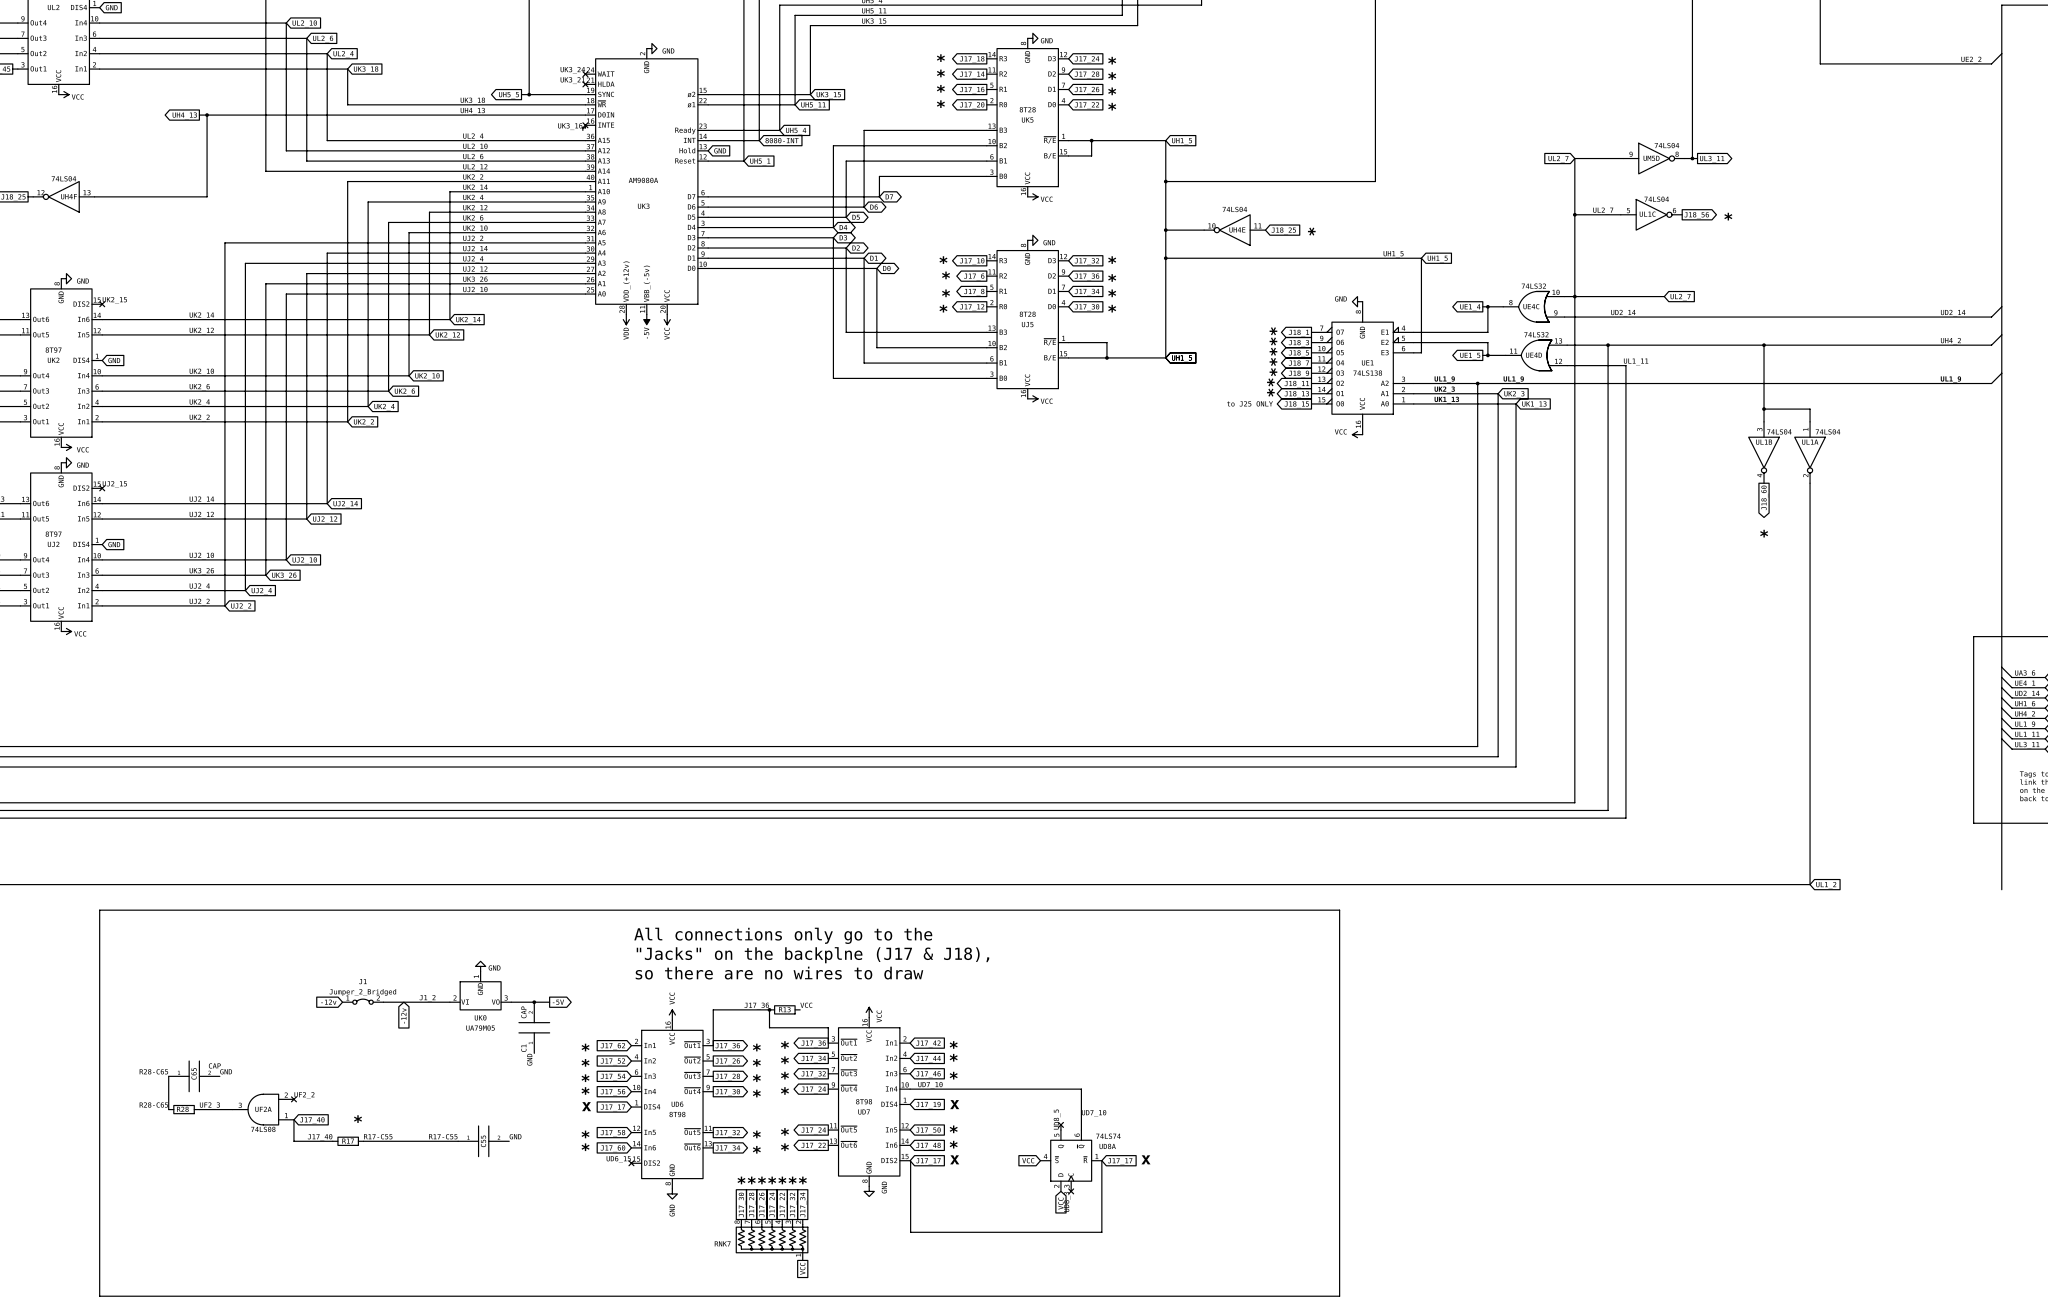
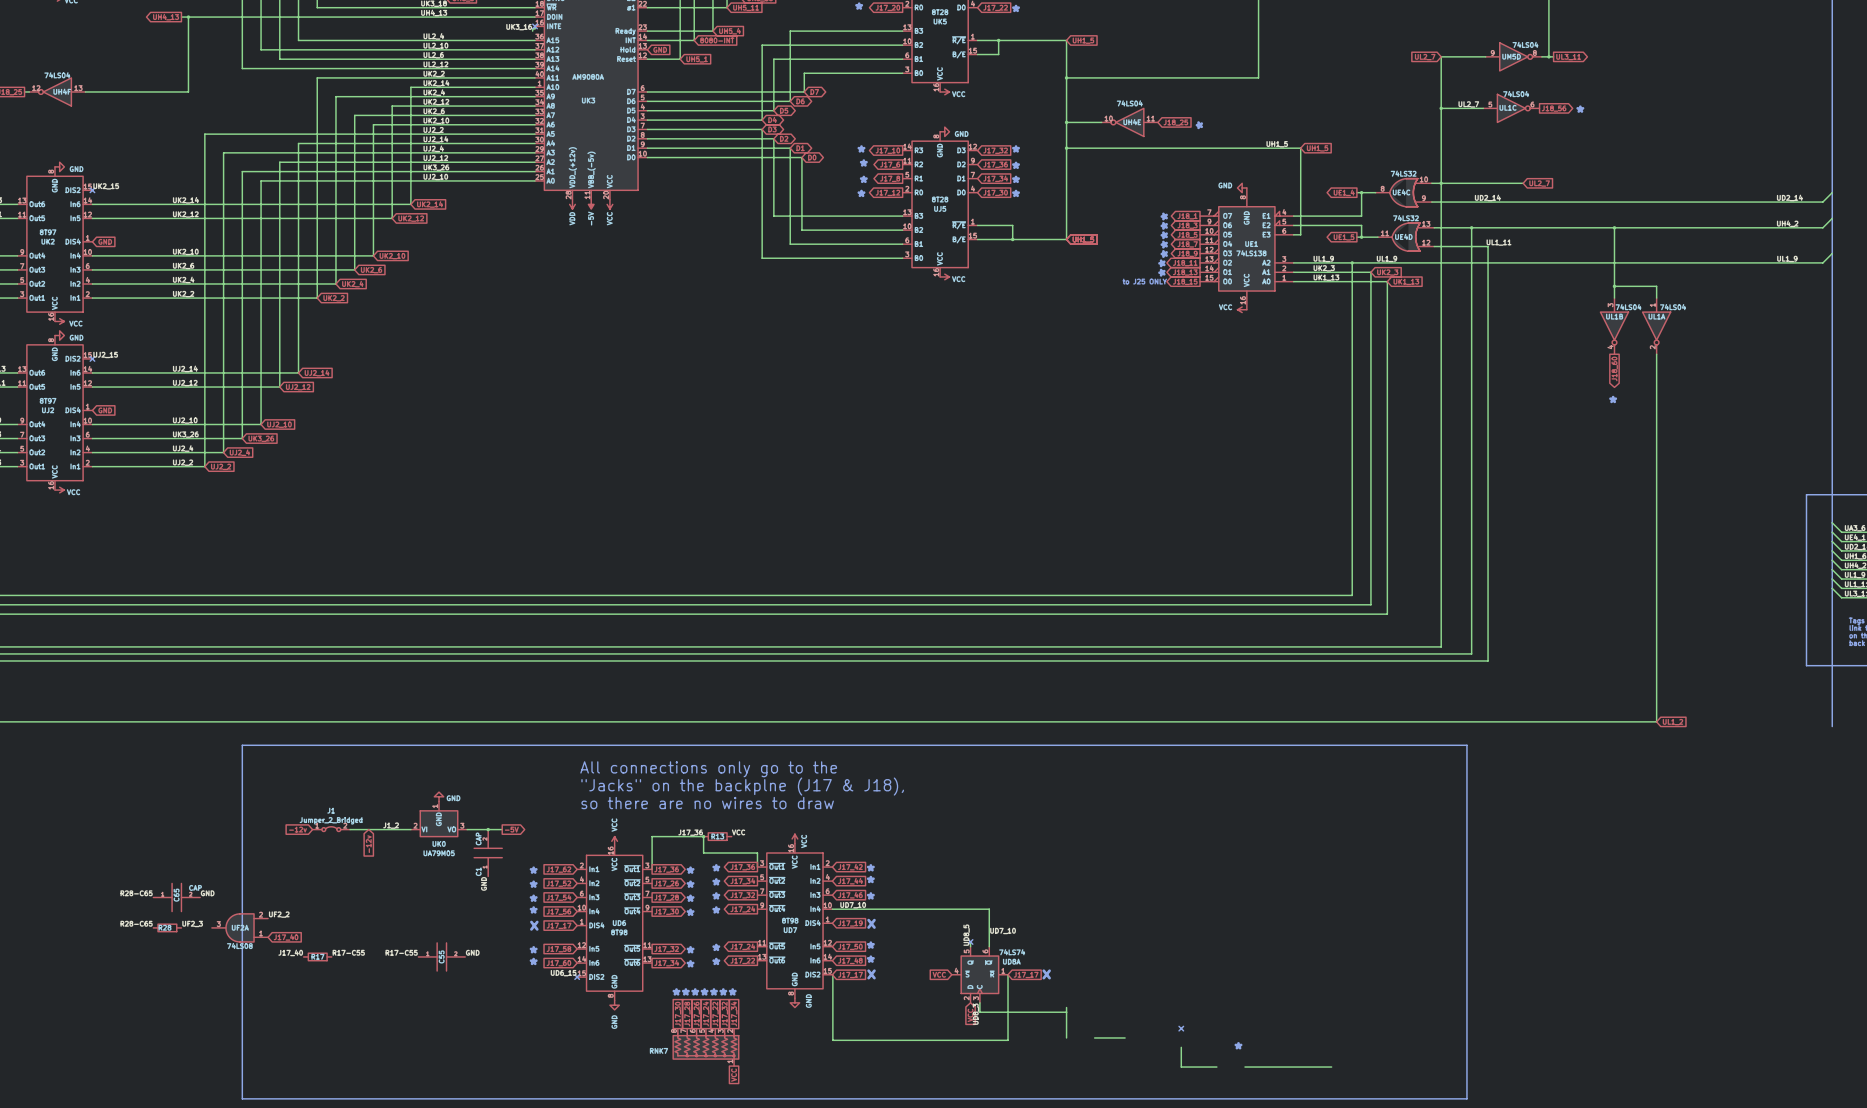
line: (265, 910) (99, 910) (99, 1296) (265, 1296) -> (242, 745) (242, 1098)
line: (1339, 910) (1339, 1296) -> (1225, 745) (1466, 745) (1466, 1098) (1225, 1098)
wire: (168, 1076) (168, 1109) -> none
no-connect mark: (293, 1099) -> none
wire: (199, 1109) (232, 1109) -> none
wire: (293, 1119) (293, 1141) (332, 1141) -> none
text: * (358, 1119) -> none
wire: (363, 1141) (458, 1141) -> none
wire: none -> (979, 1002) (979, 1012) (1066, 1012)
no-connect mark: (1071, 1191) -> none
wire: none -> (1066, 1007) (1066, 1037)
no-connect mark: none -> (1181, 1028)
wire: none -> (1094, 1037) (1125, 1037)
wire: none -> (1181, 1047) (1181, 1067) (1216, 1067)
text: none -> * (1238, 1045)
wire: none -> (1244, 1067) (1331, 1067)

